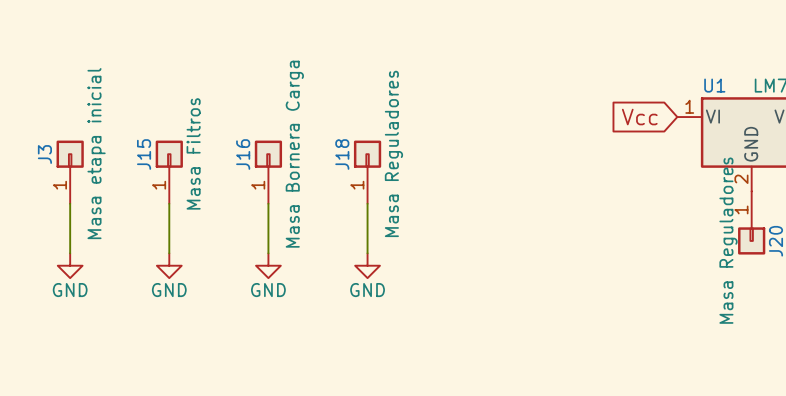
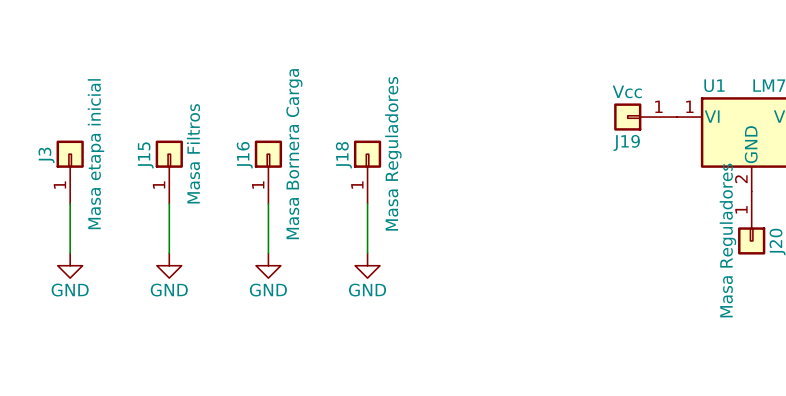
global label: Vcc (639, 117) -> none
J19: none -> Vcc (645, 117)

